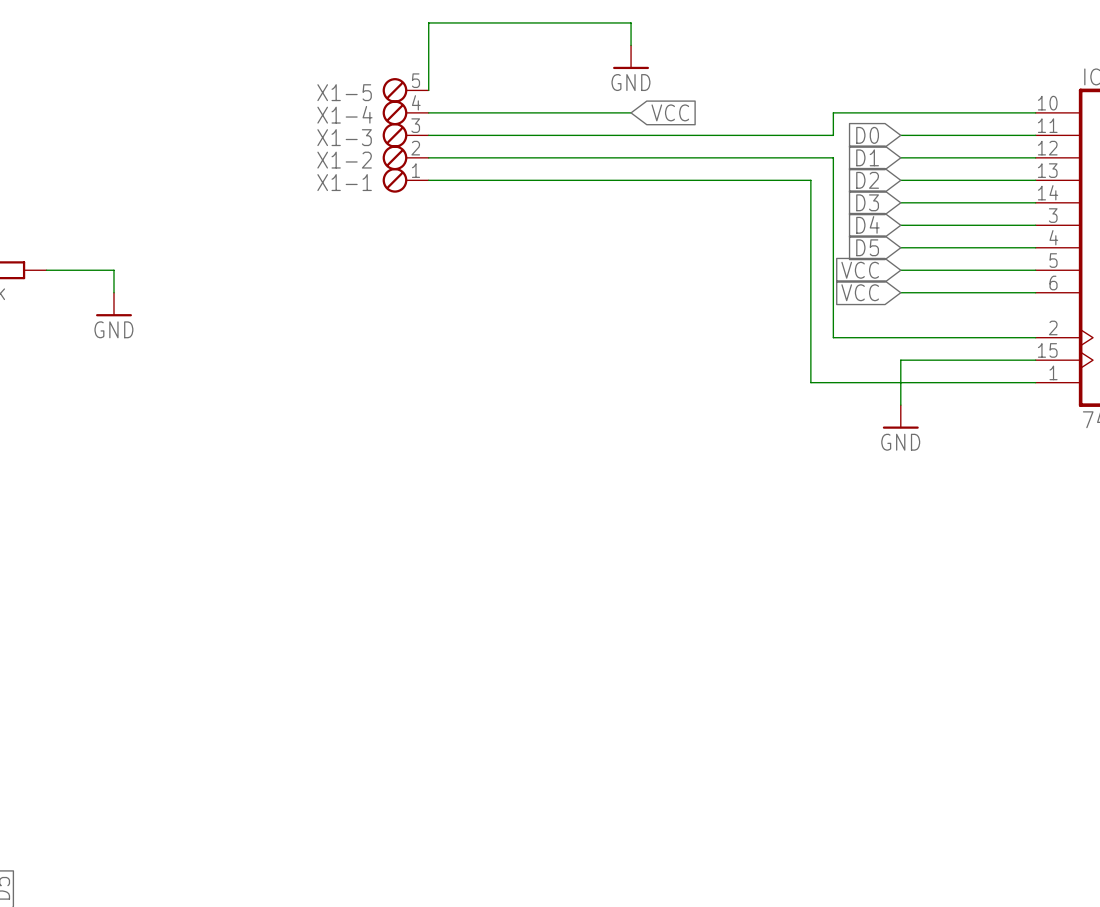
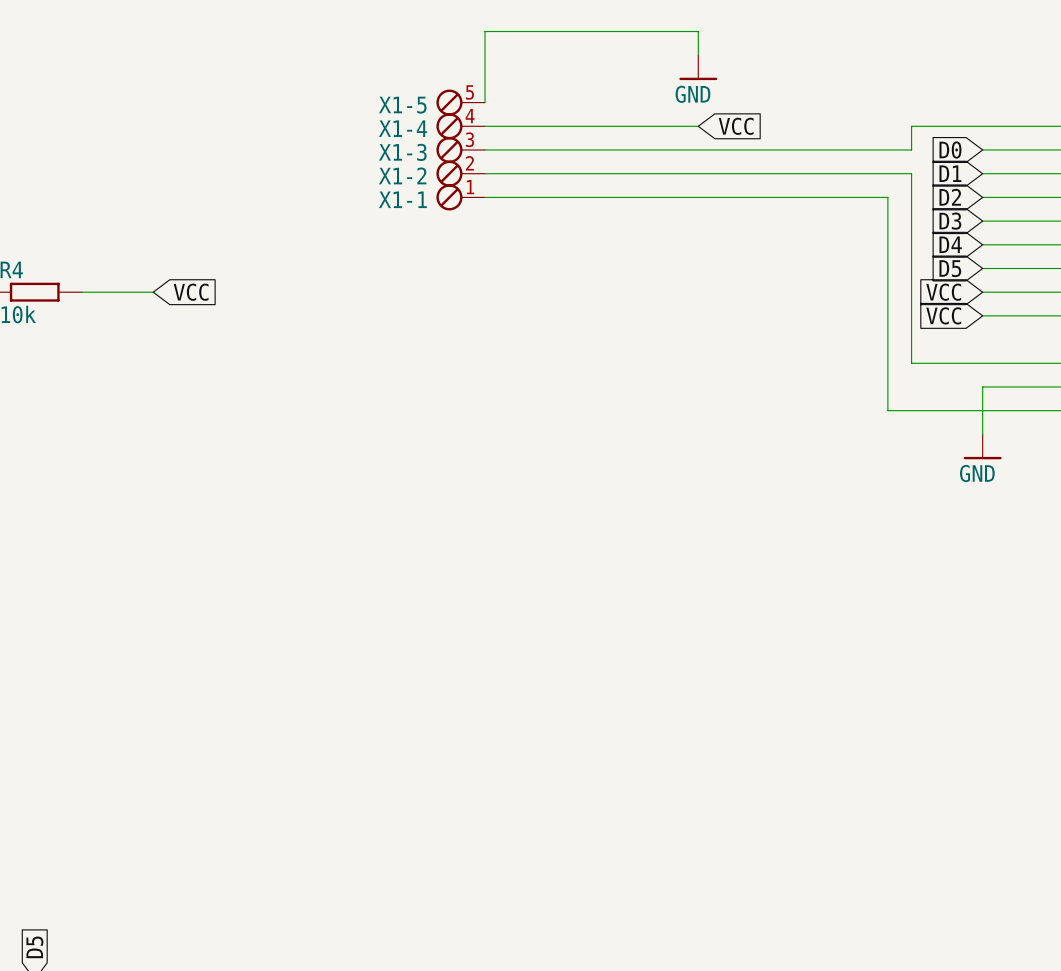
wire: (113, 270) (113, 292) -> none
global label: none -> VCC (191, 292)
power symbol: GND (113, 304) -> none

